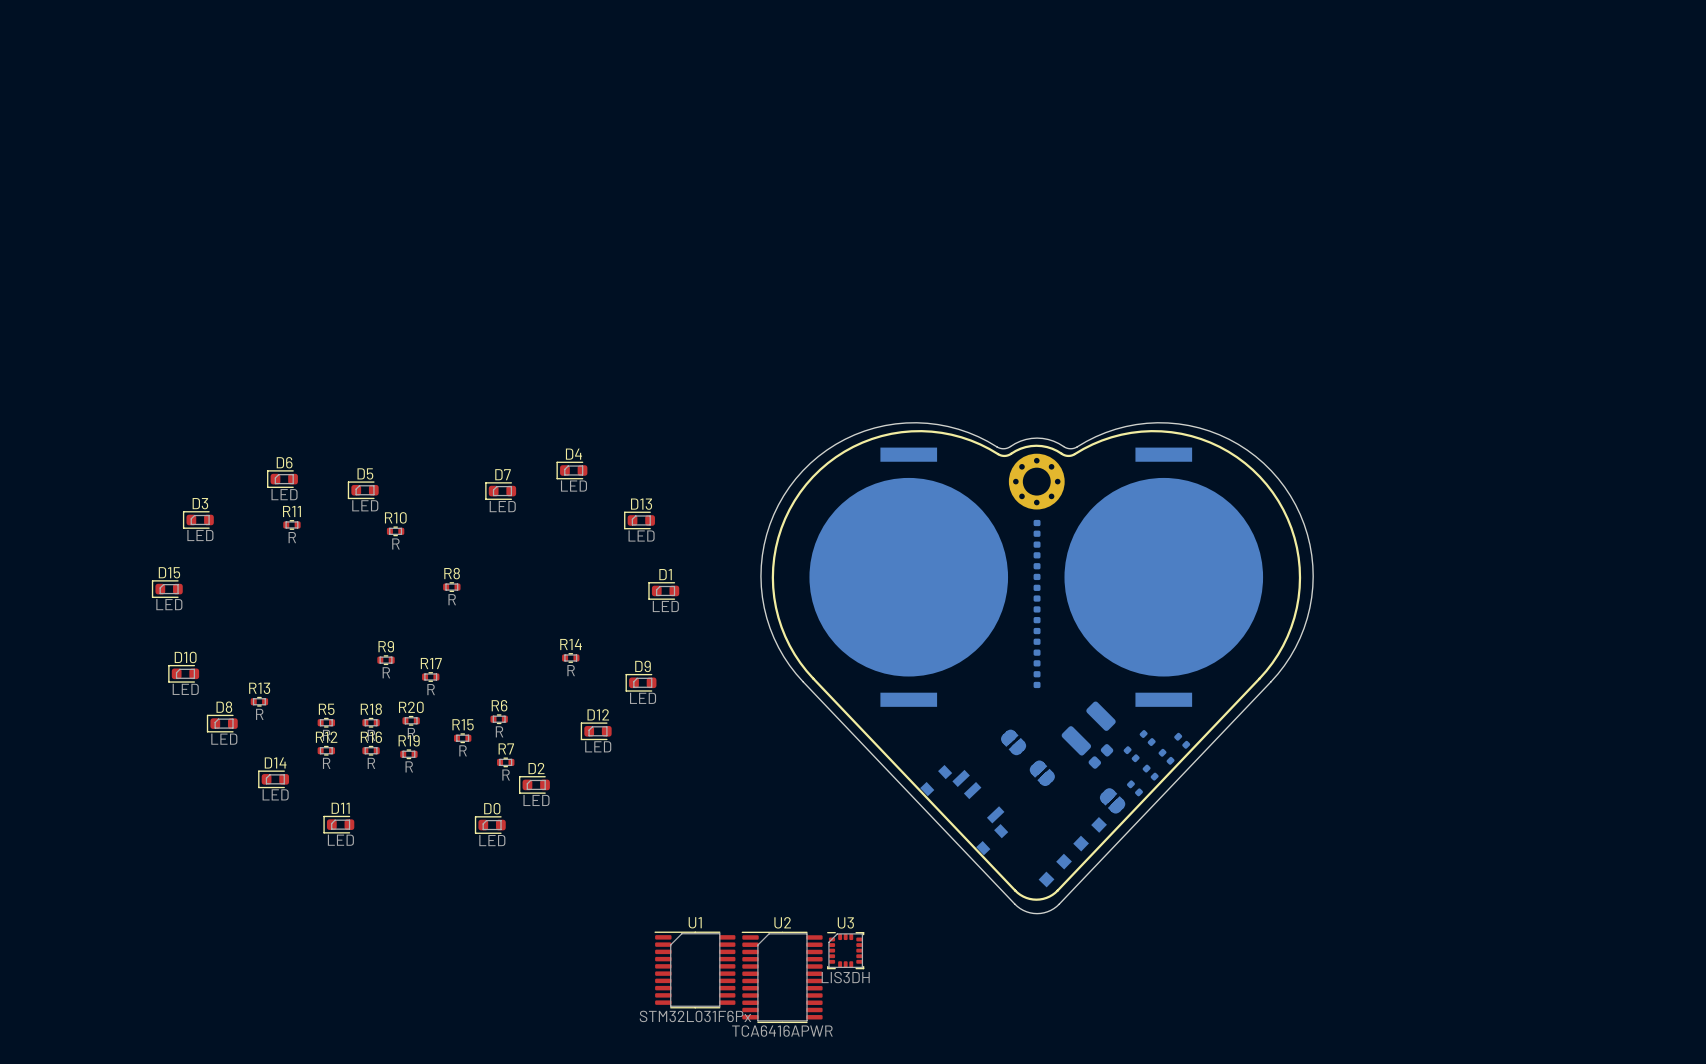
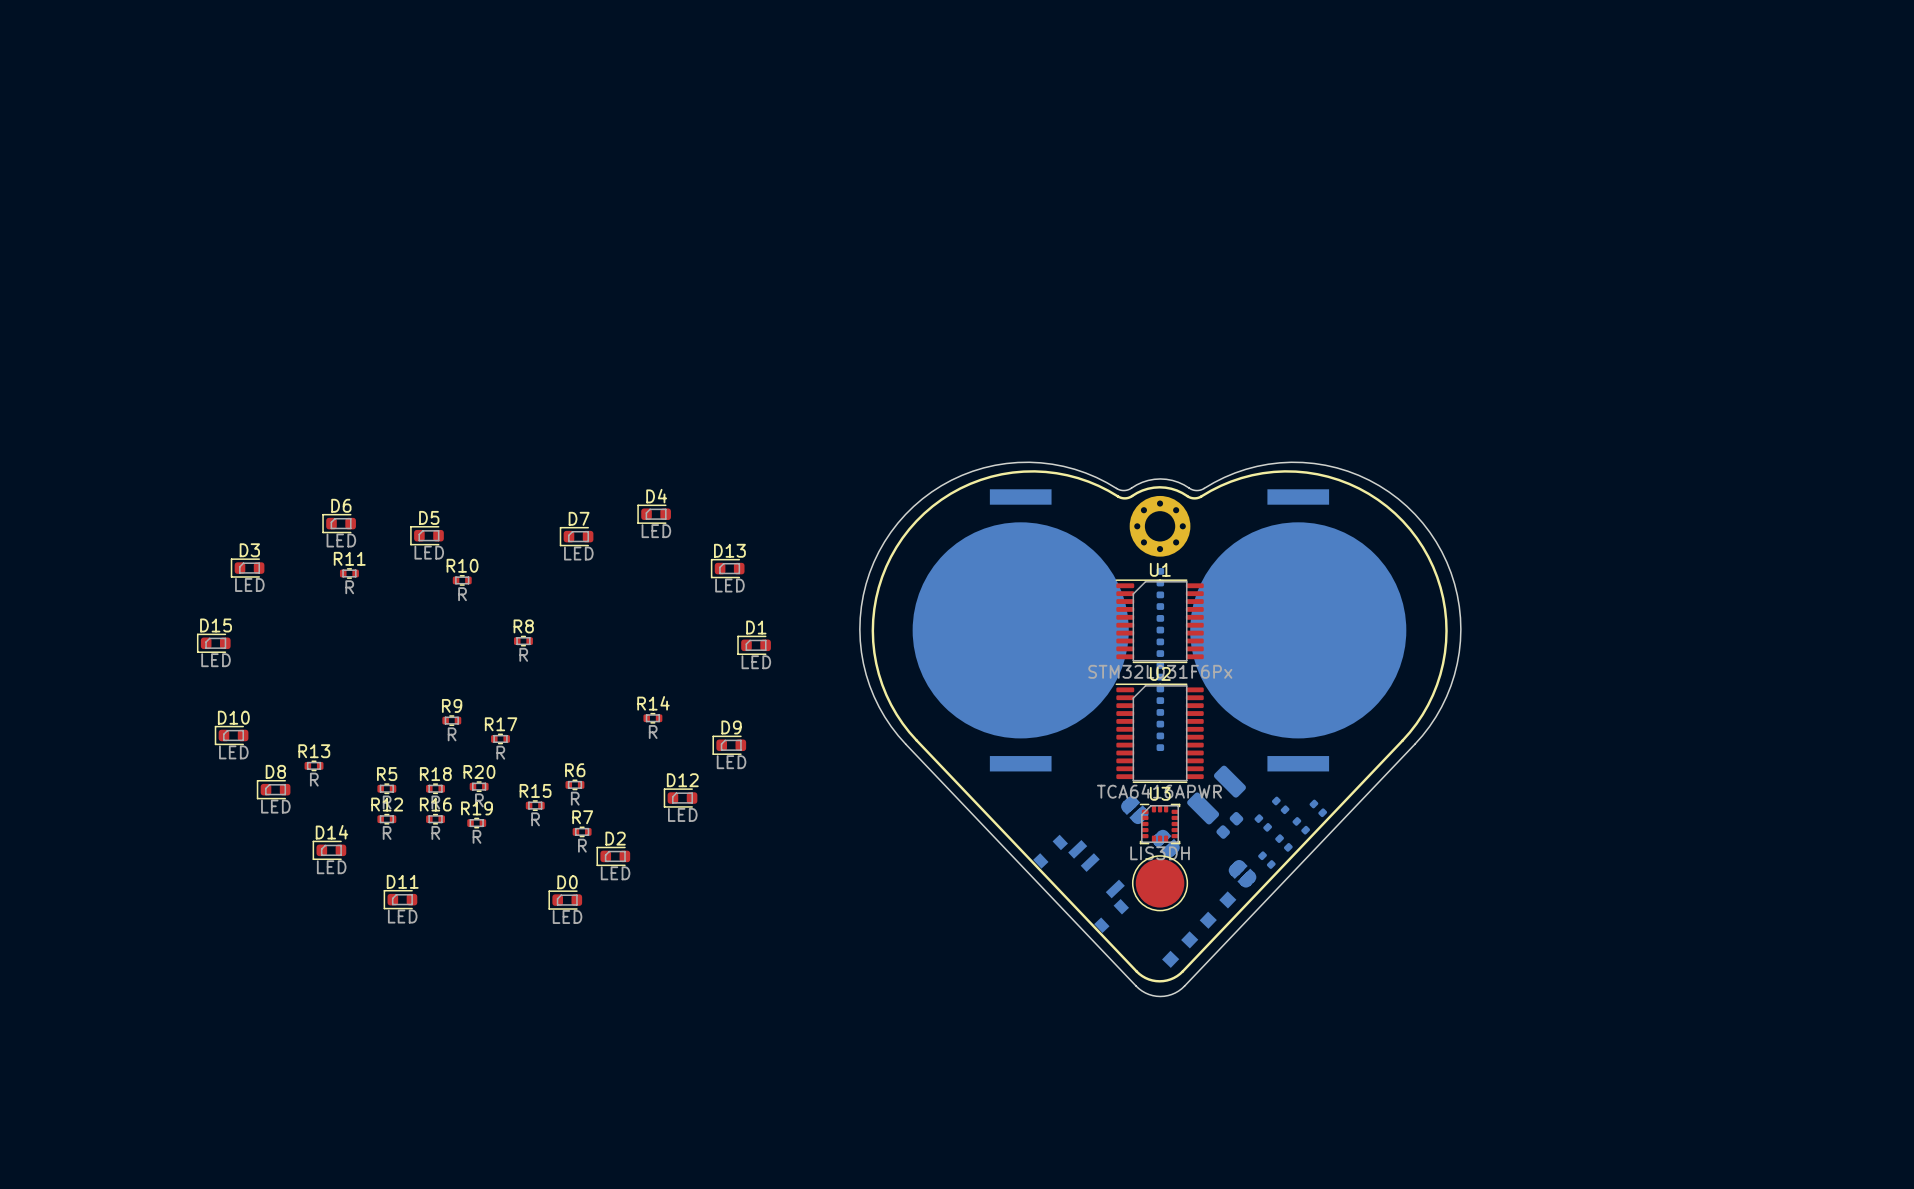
part: none -> (1160, 883)
U3 position: (845, 950) -> (1160, 824)
U1 position: (694, 970) -> (1159, 621)
U2 position: (782, 977) -> (1159, 733)

